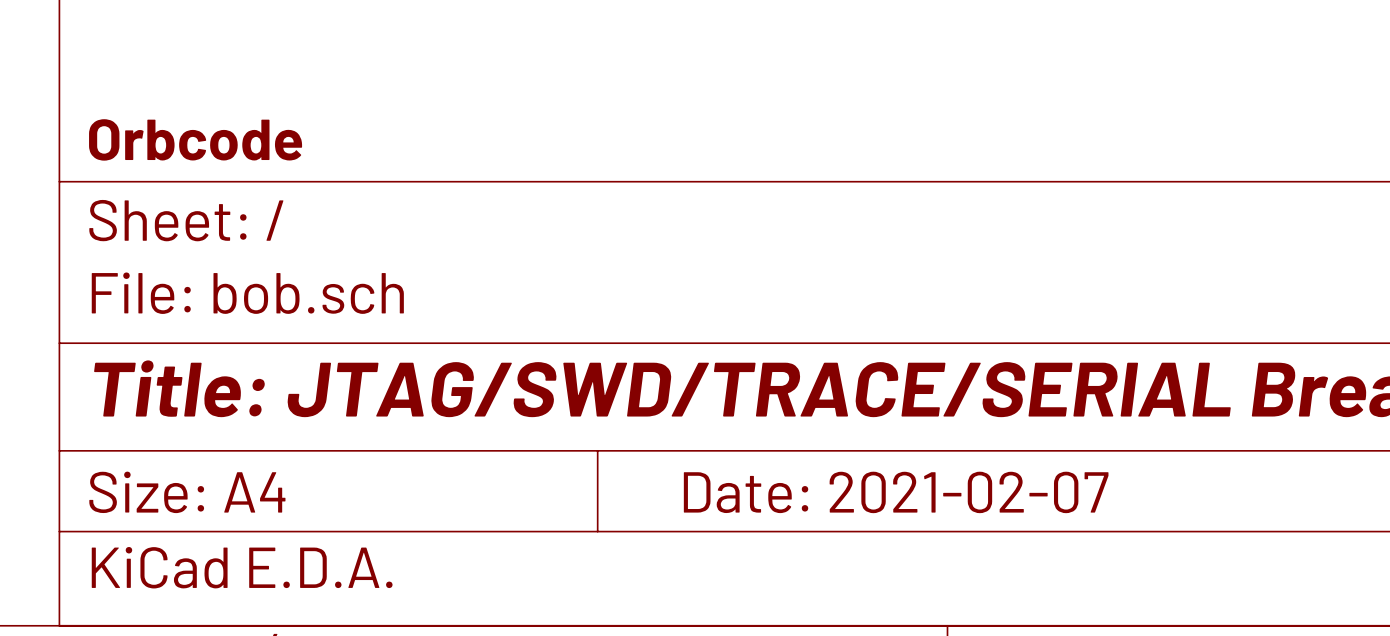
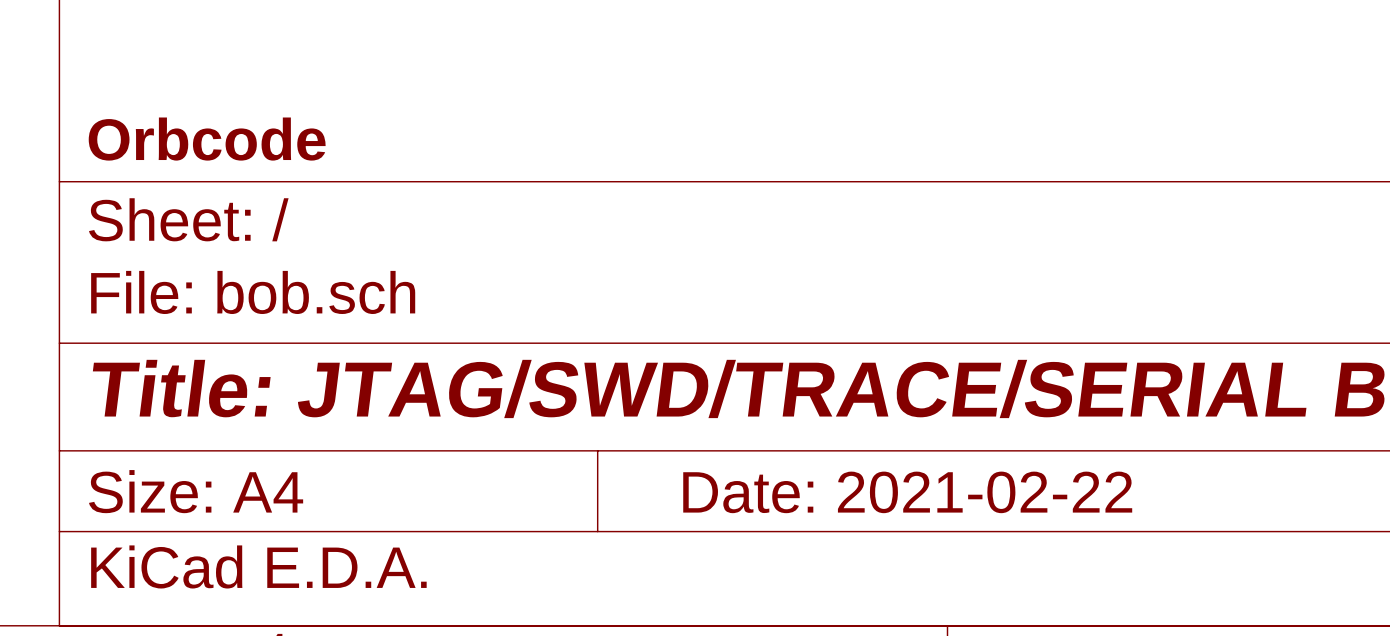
title block: Date: 2021-02-07 (896, 492) -> Date: 2021-02-22 (907, 492)

